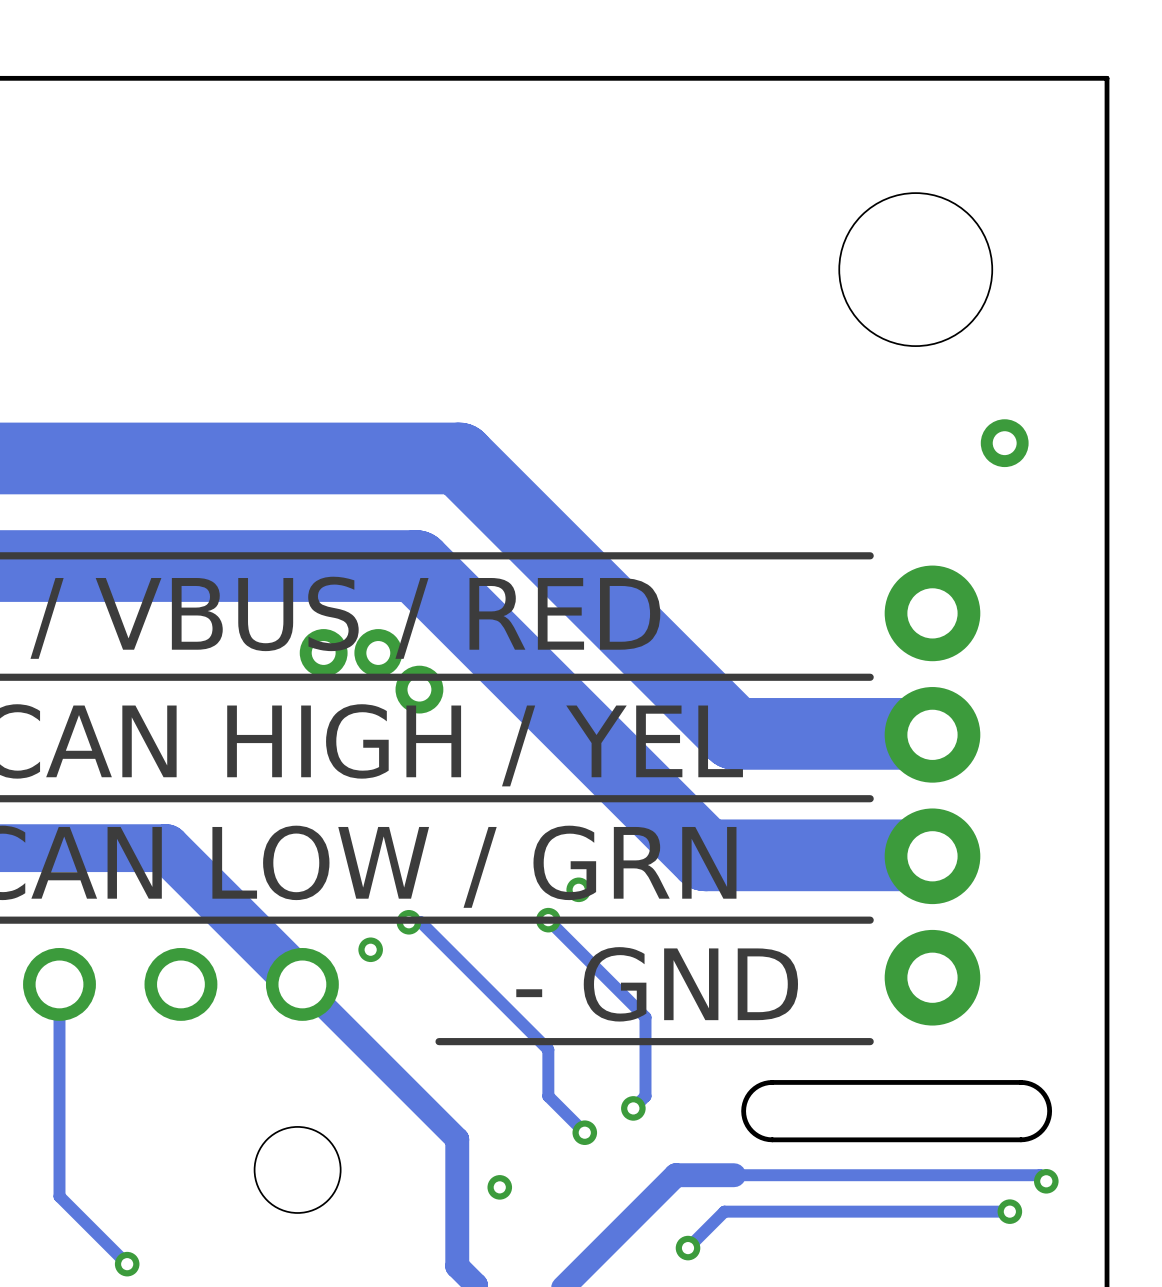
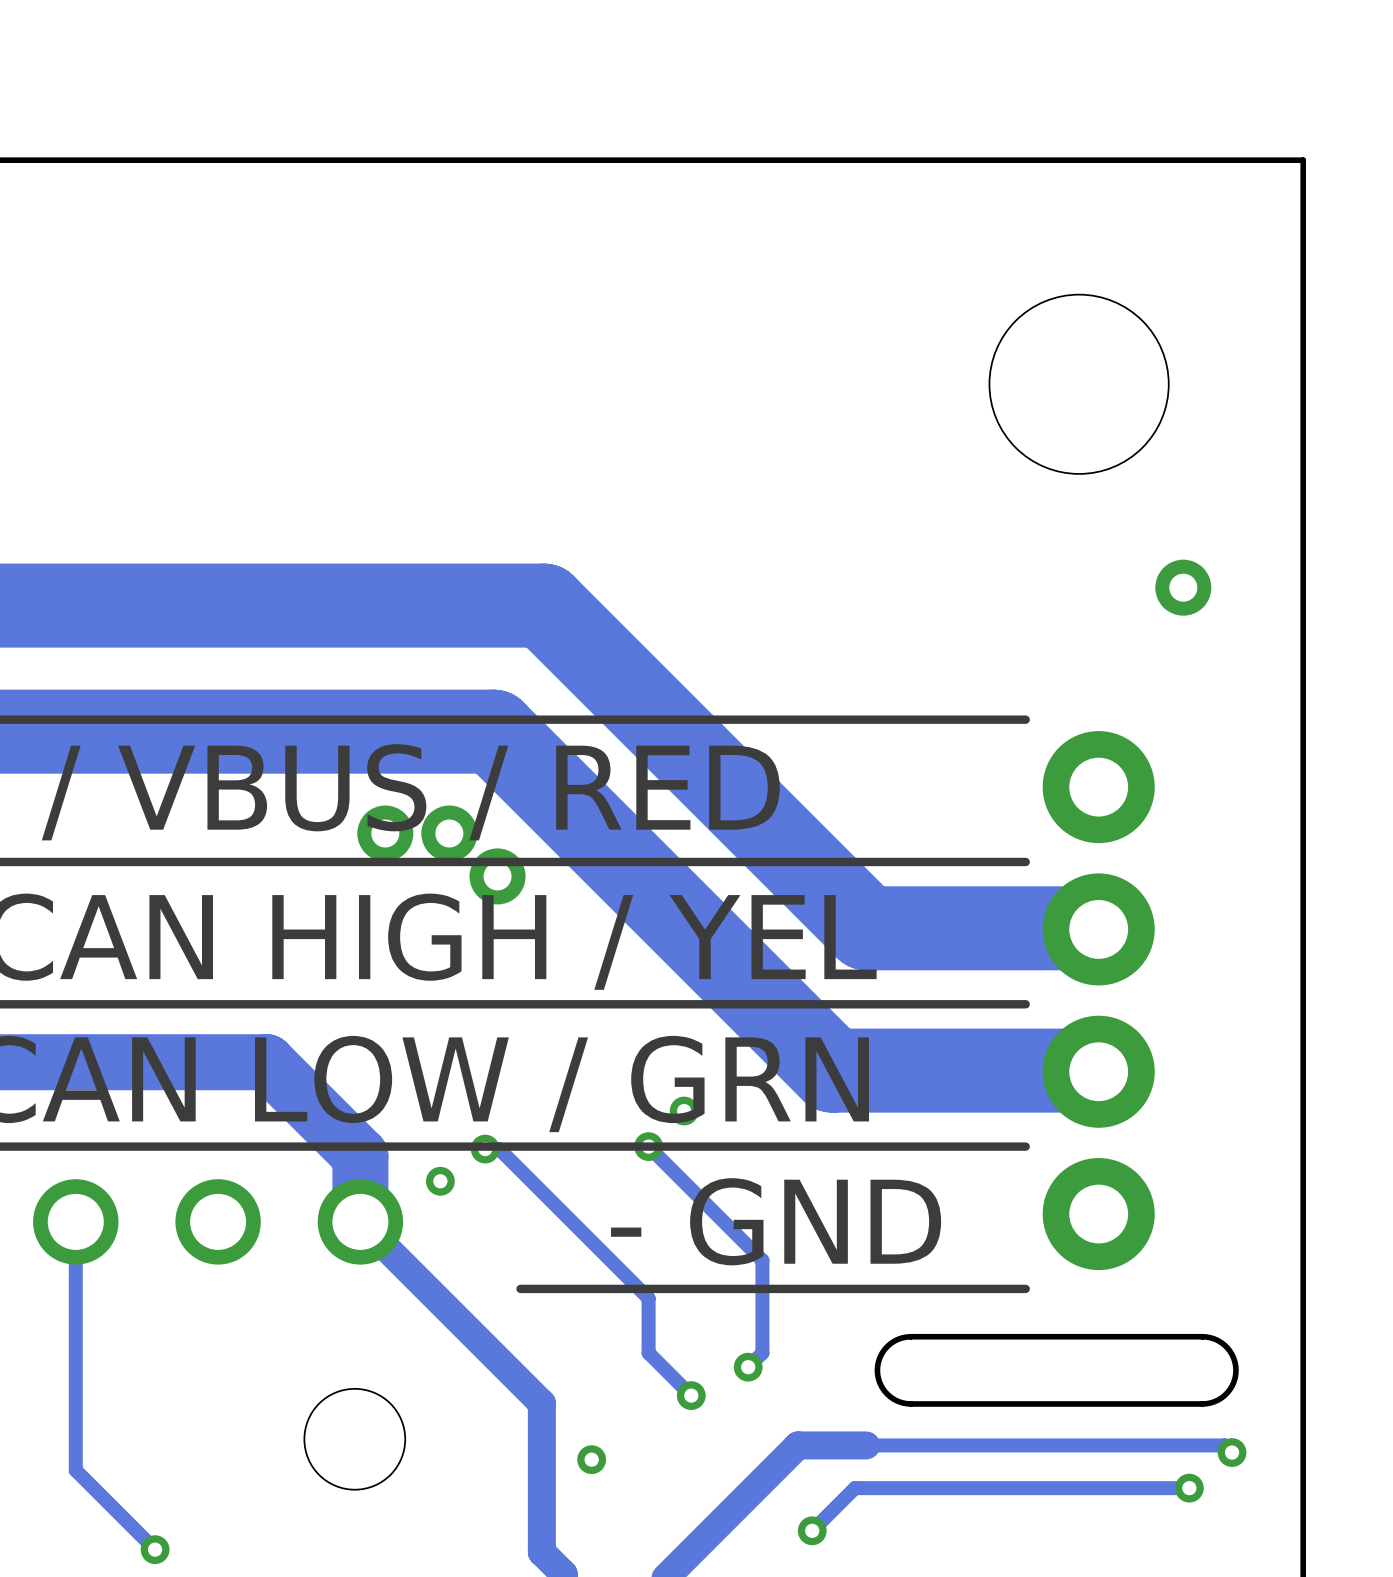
track: (166, 848) (302, 984) -> (200, 1062) (266, 1062) (360, 1155) (360, 1221)

